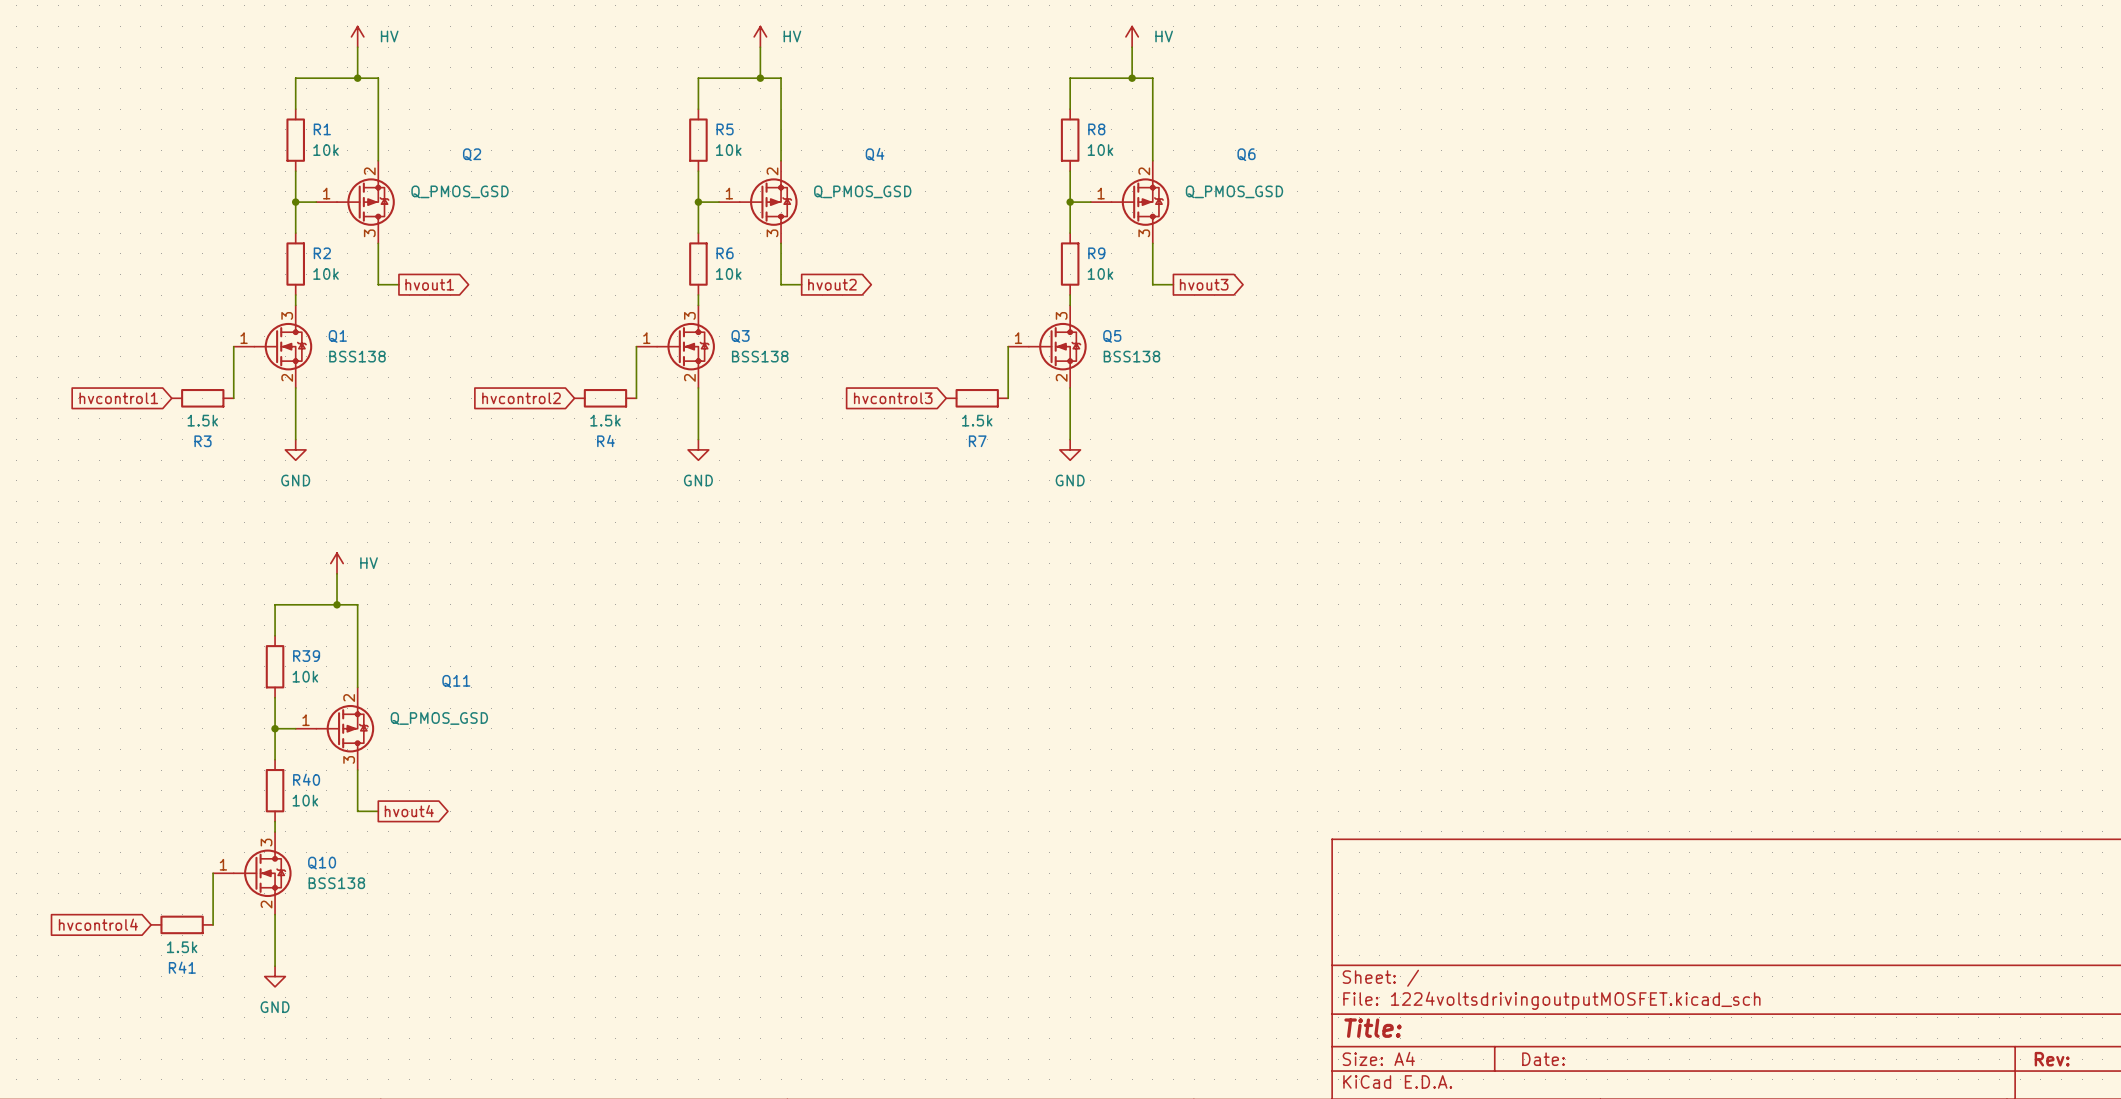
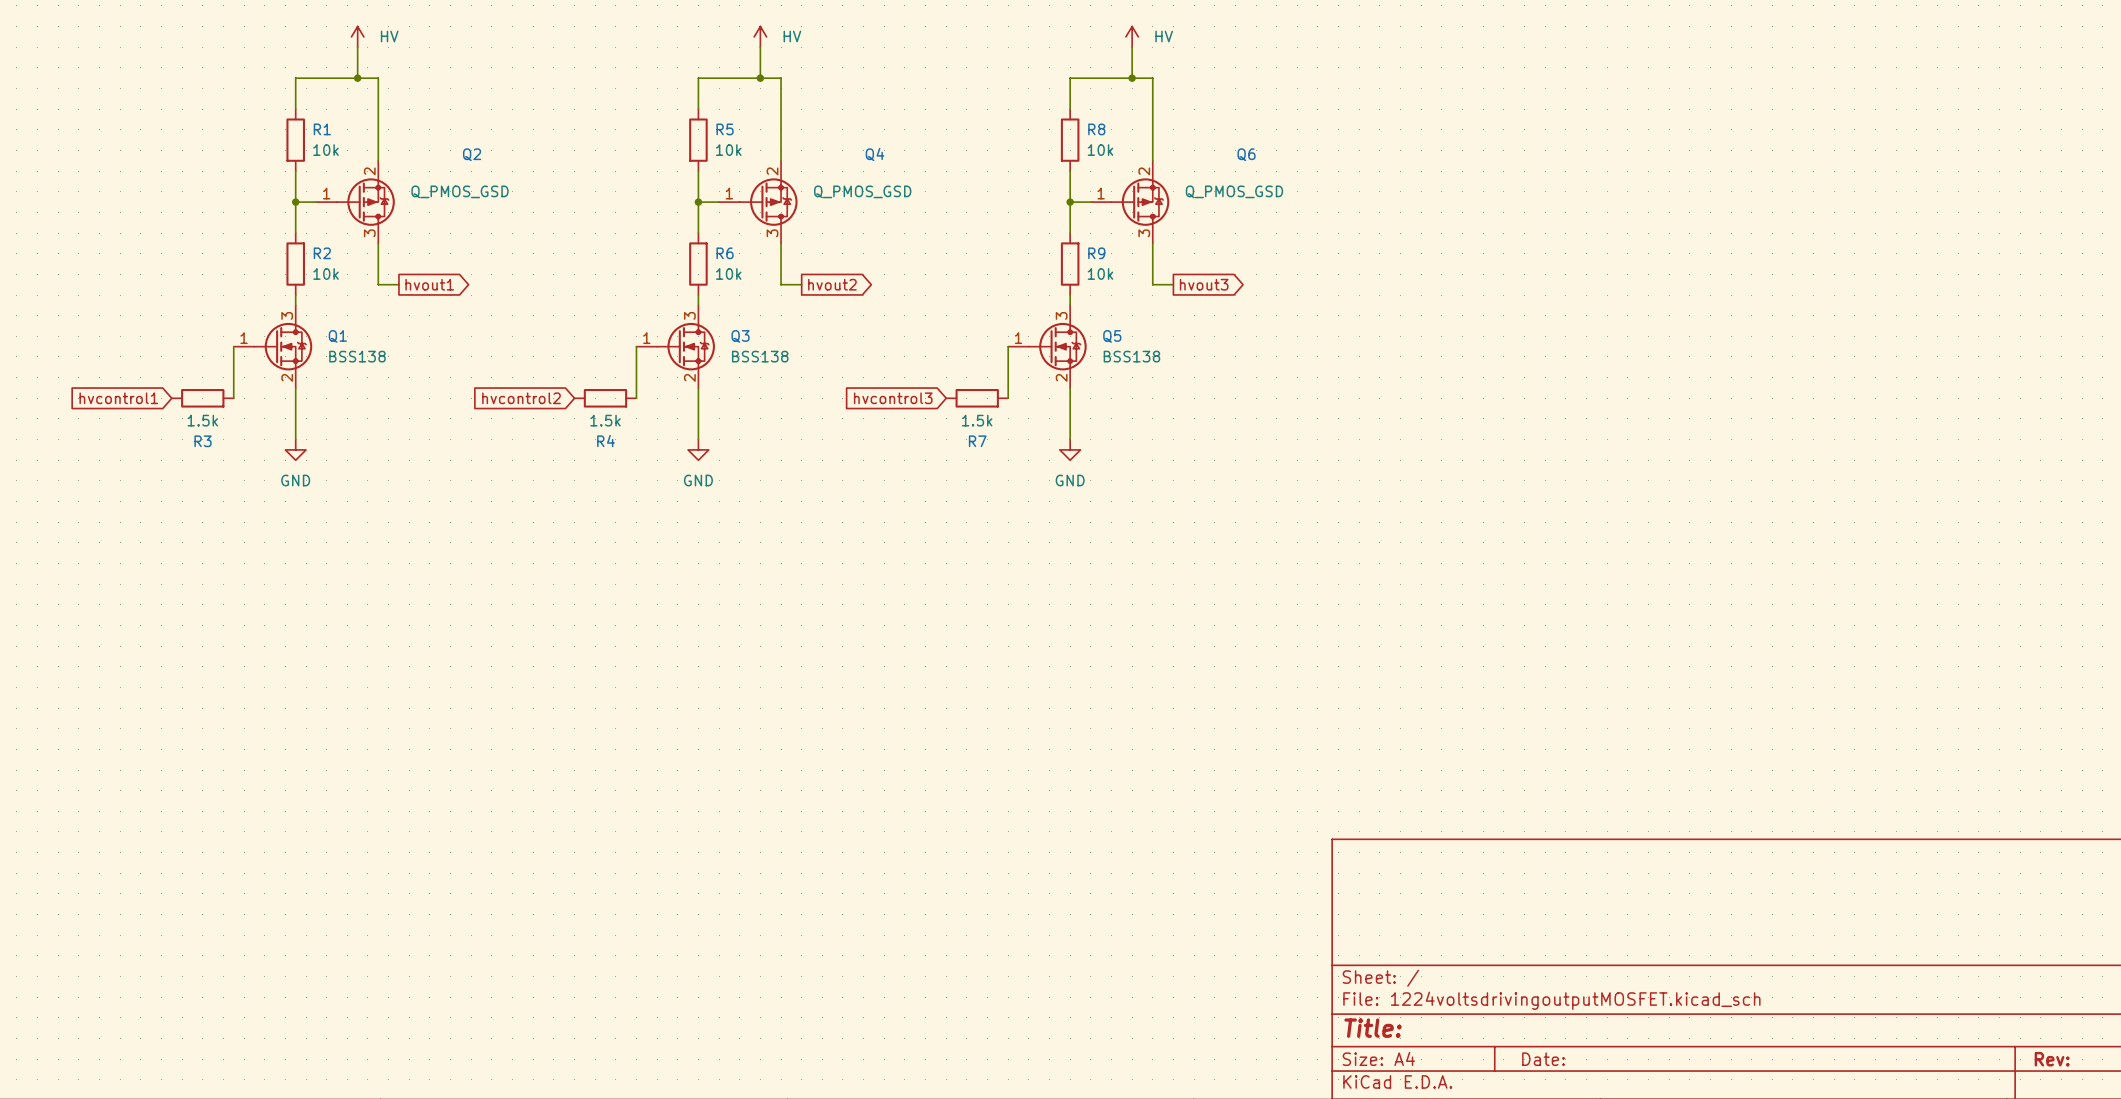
power symbol: HV (337, 563) -> none
wire: (337, 573) (337, 604) -> none
junction: (337, 604) -> none
wire: (275, 635) (275, 604) (357, 604) (357, 687) -> none
R39: 10k (275, 666) -> none
wire: (275, 697) (275, 759) -> none
wire: (275, 728) (295, 728) -> none
junction: (275, 728) -> none
Q11: Q_PMOS_GSD (334, 728) -> none
wire: (357, 770) (357, 811) (378, 811) -> none
R40: 10k (275, 790) -> none
global label: hvout4 (409, 811) -> none
wire: (275, 821) (275, 831) -> none
wire: (213, 873) (213, 924) -> none
Q10: BSS138 (252, 873) -> none
wire: (275, 914) (275, 966) -> none
global label: hvcontrol4 (98, 924) -> none
R41: 1.5k (182, 924) -> none
power symbol: GND (275, 976) -> none

